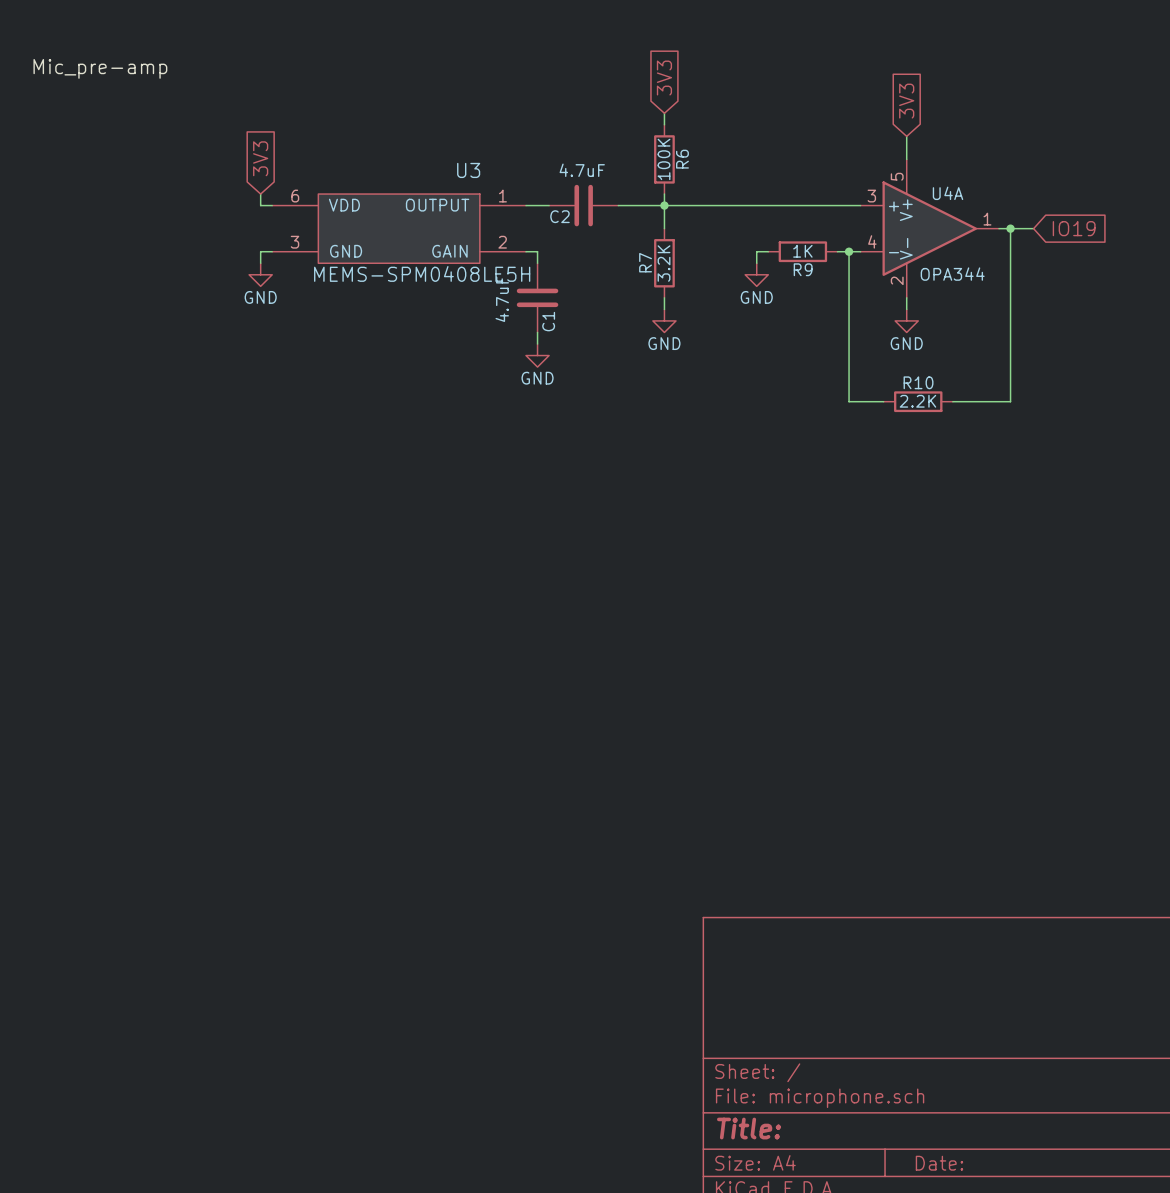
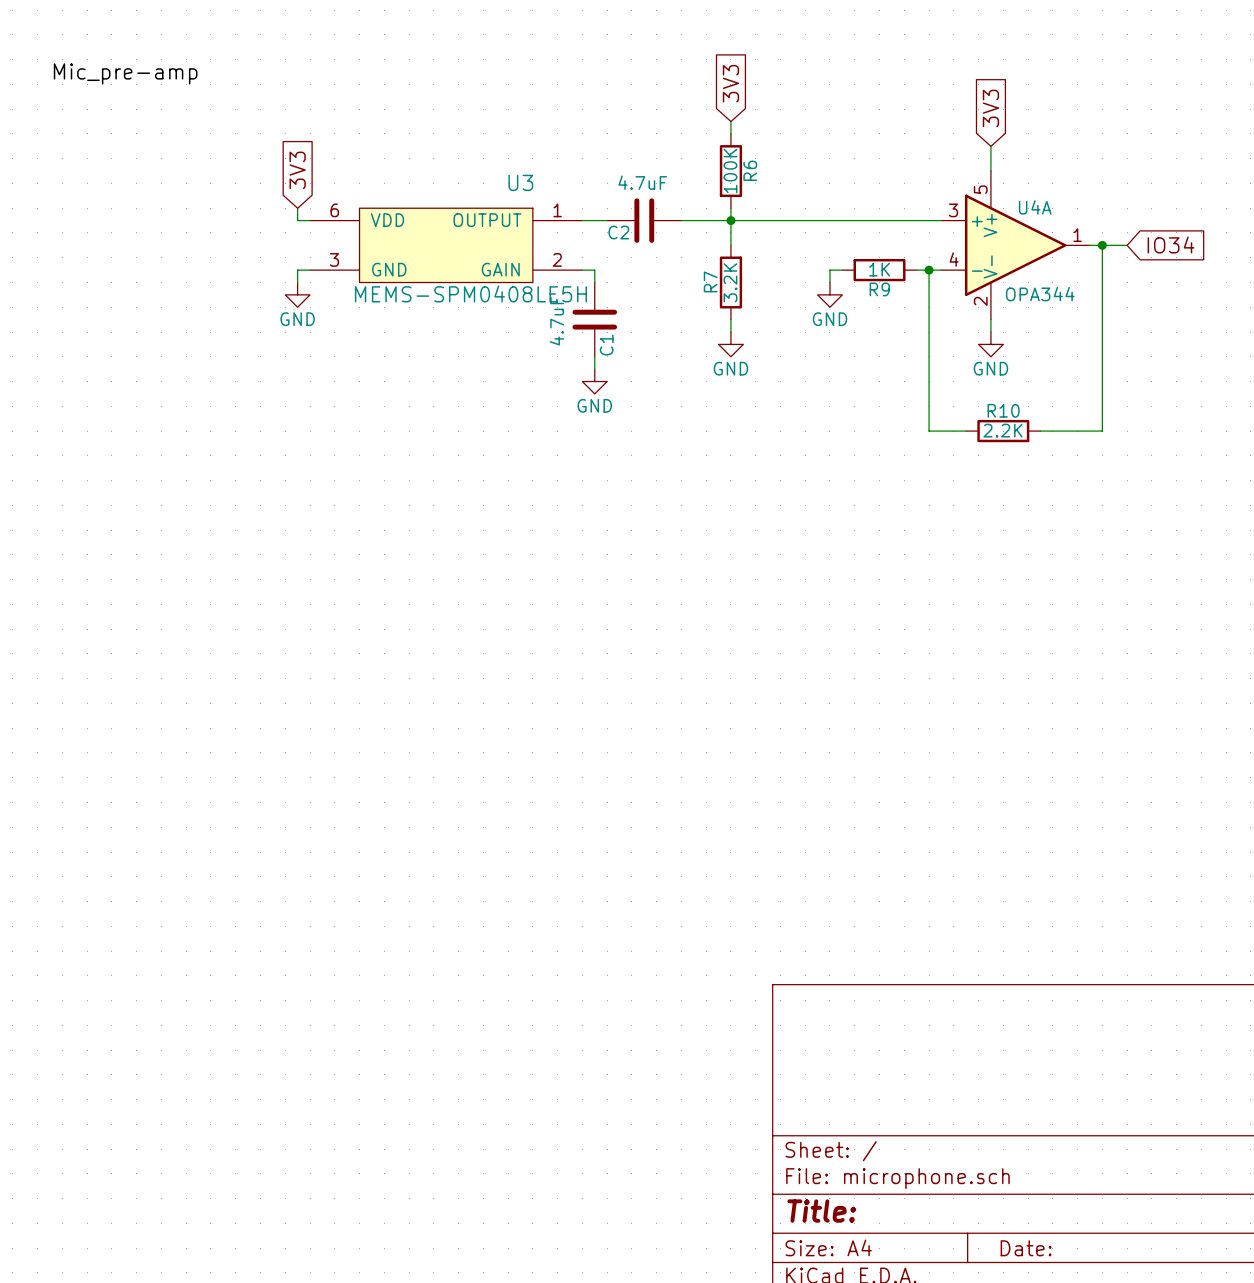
global label: IO19 (1074, 228) -> IO34 (1170, 245)

